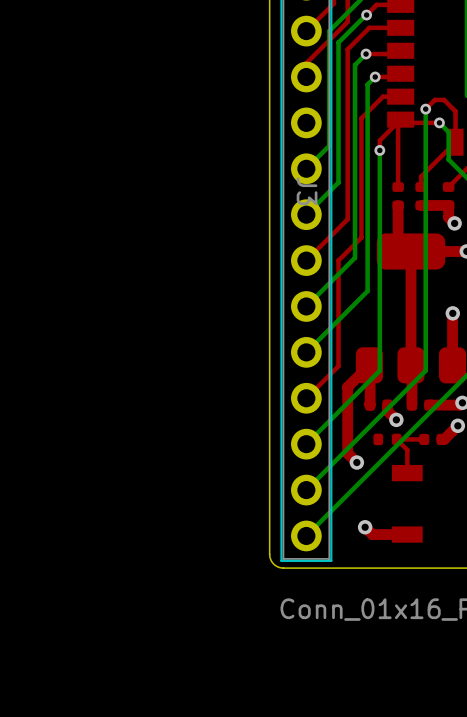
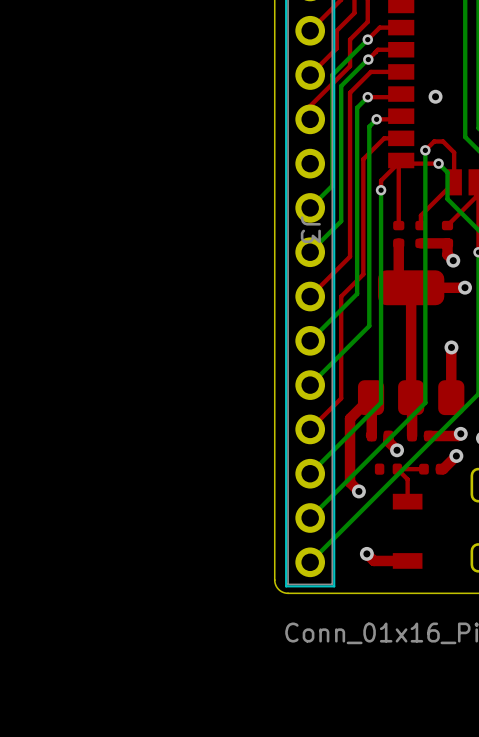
via: none -> (435, 96)

